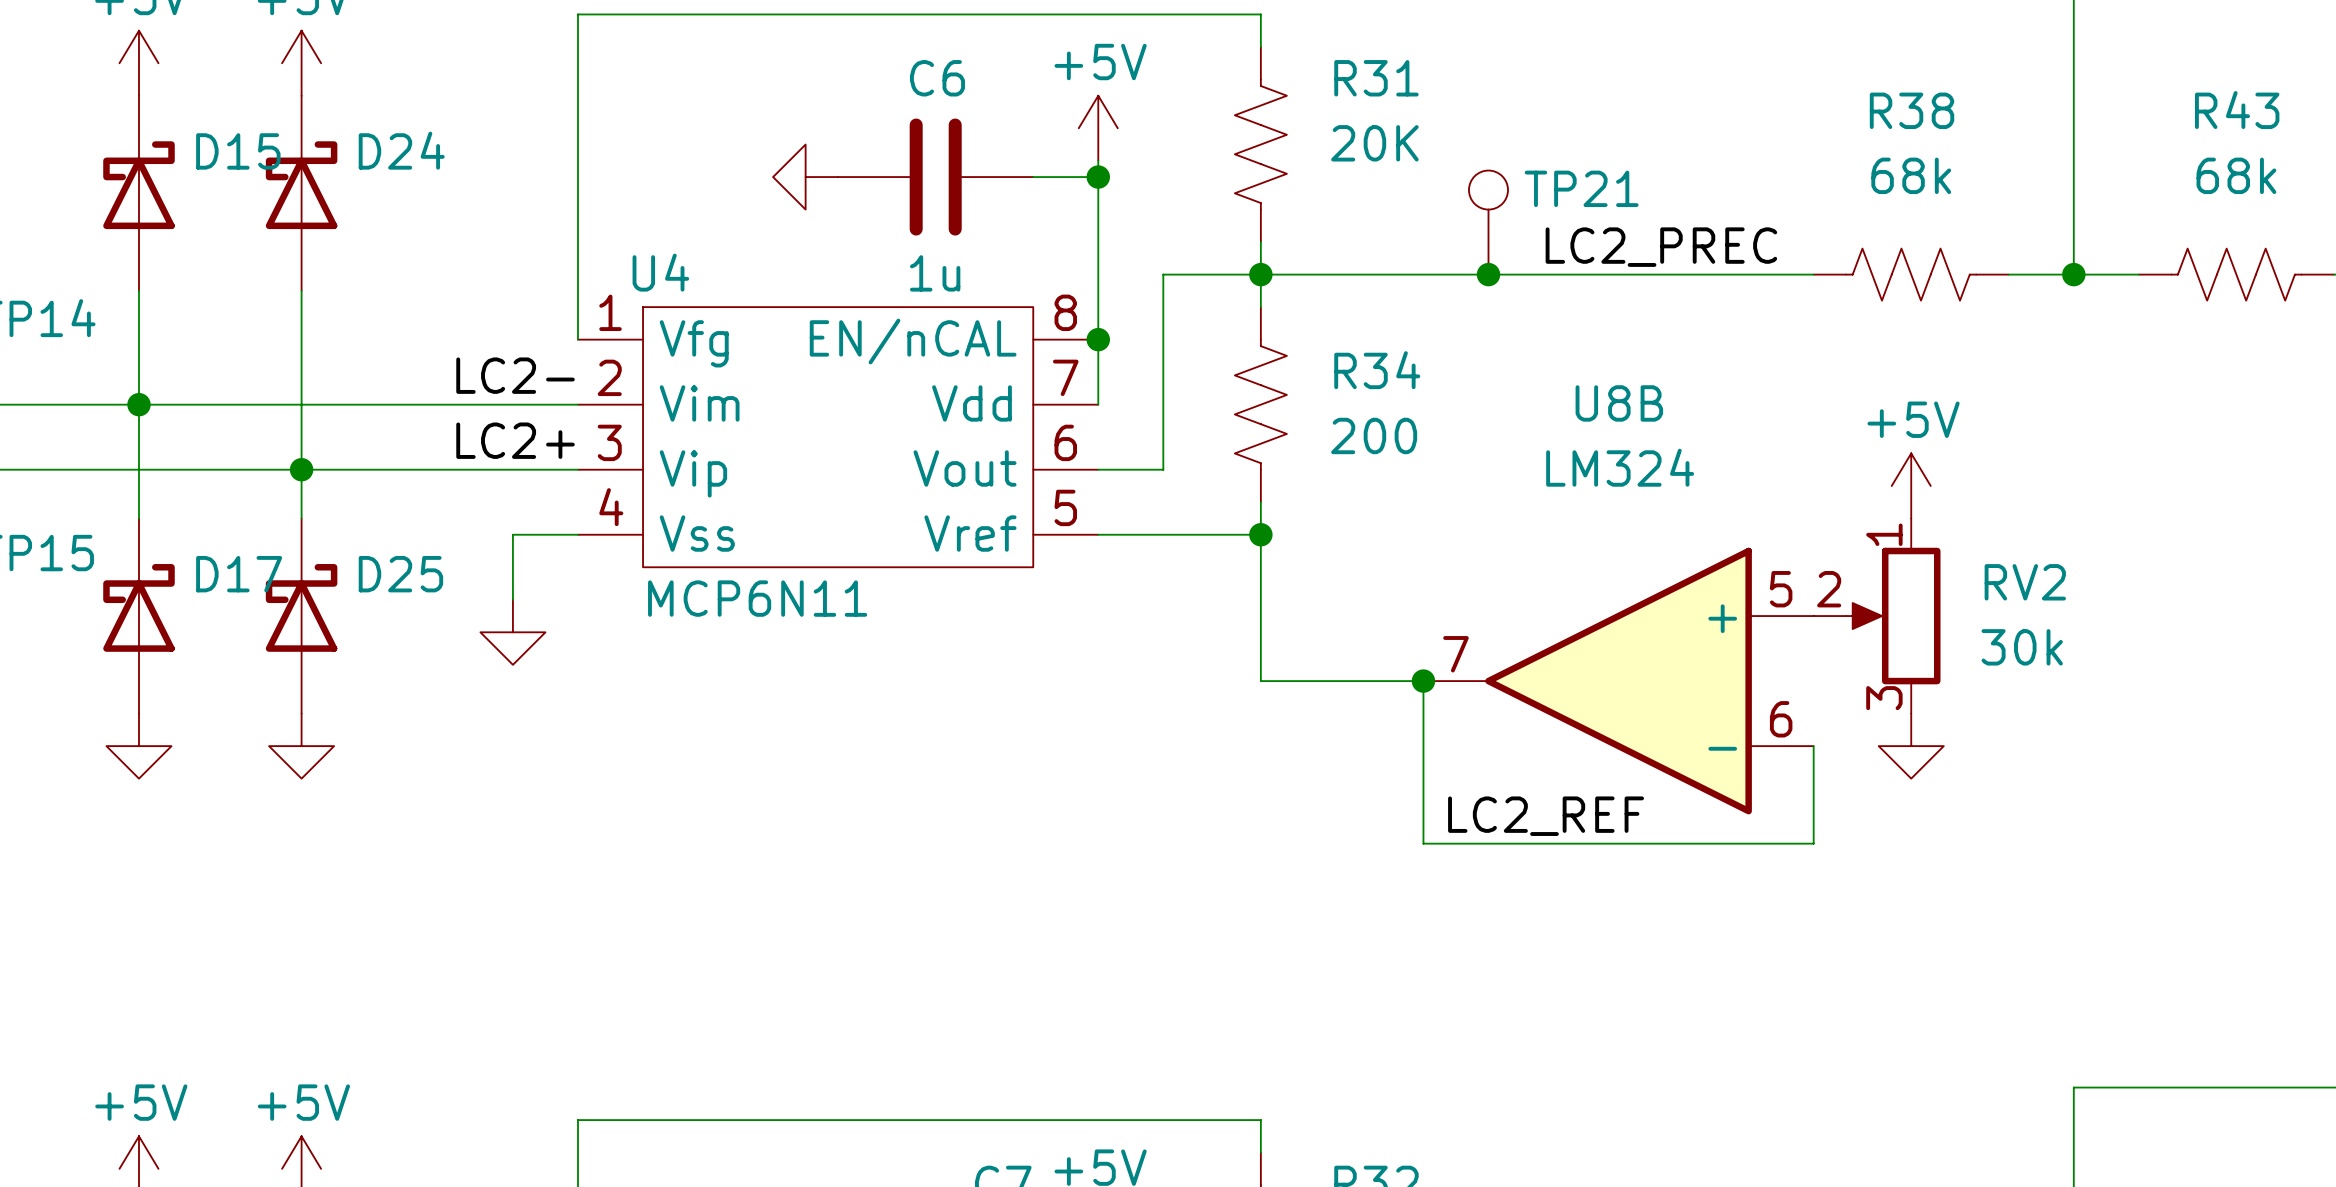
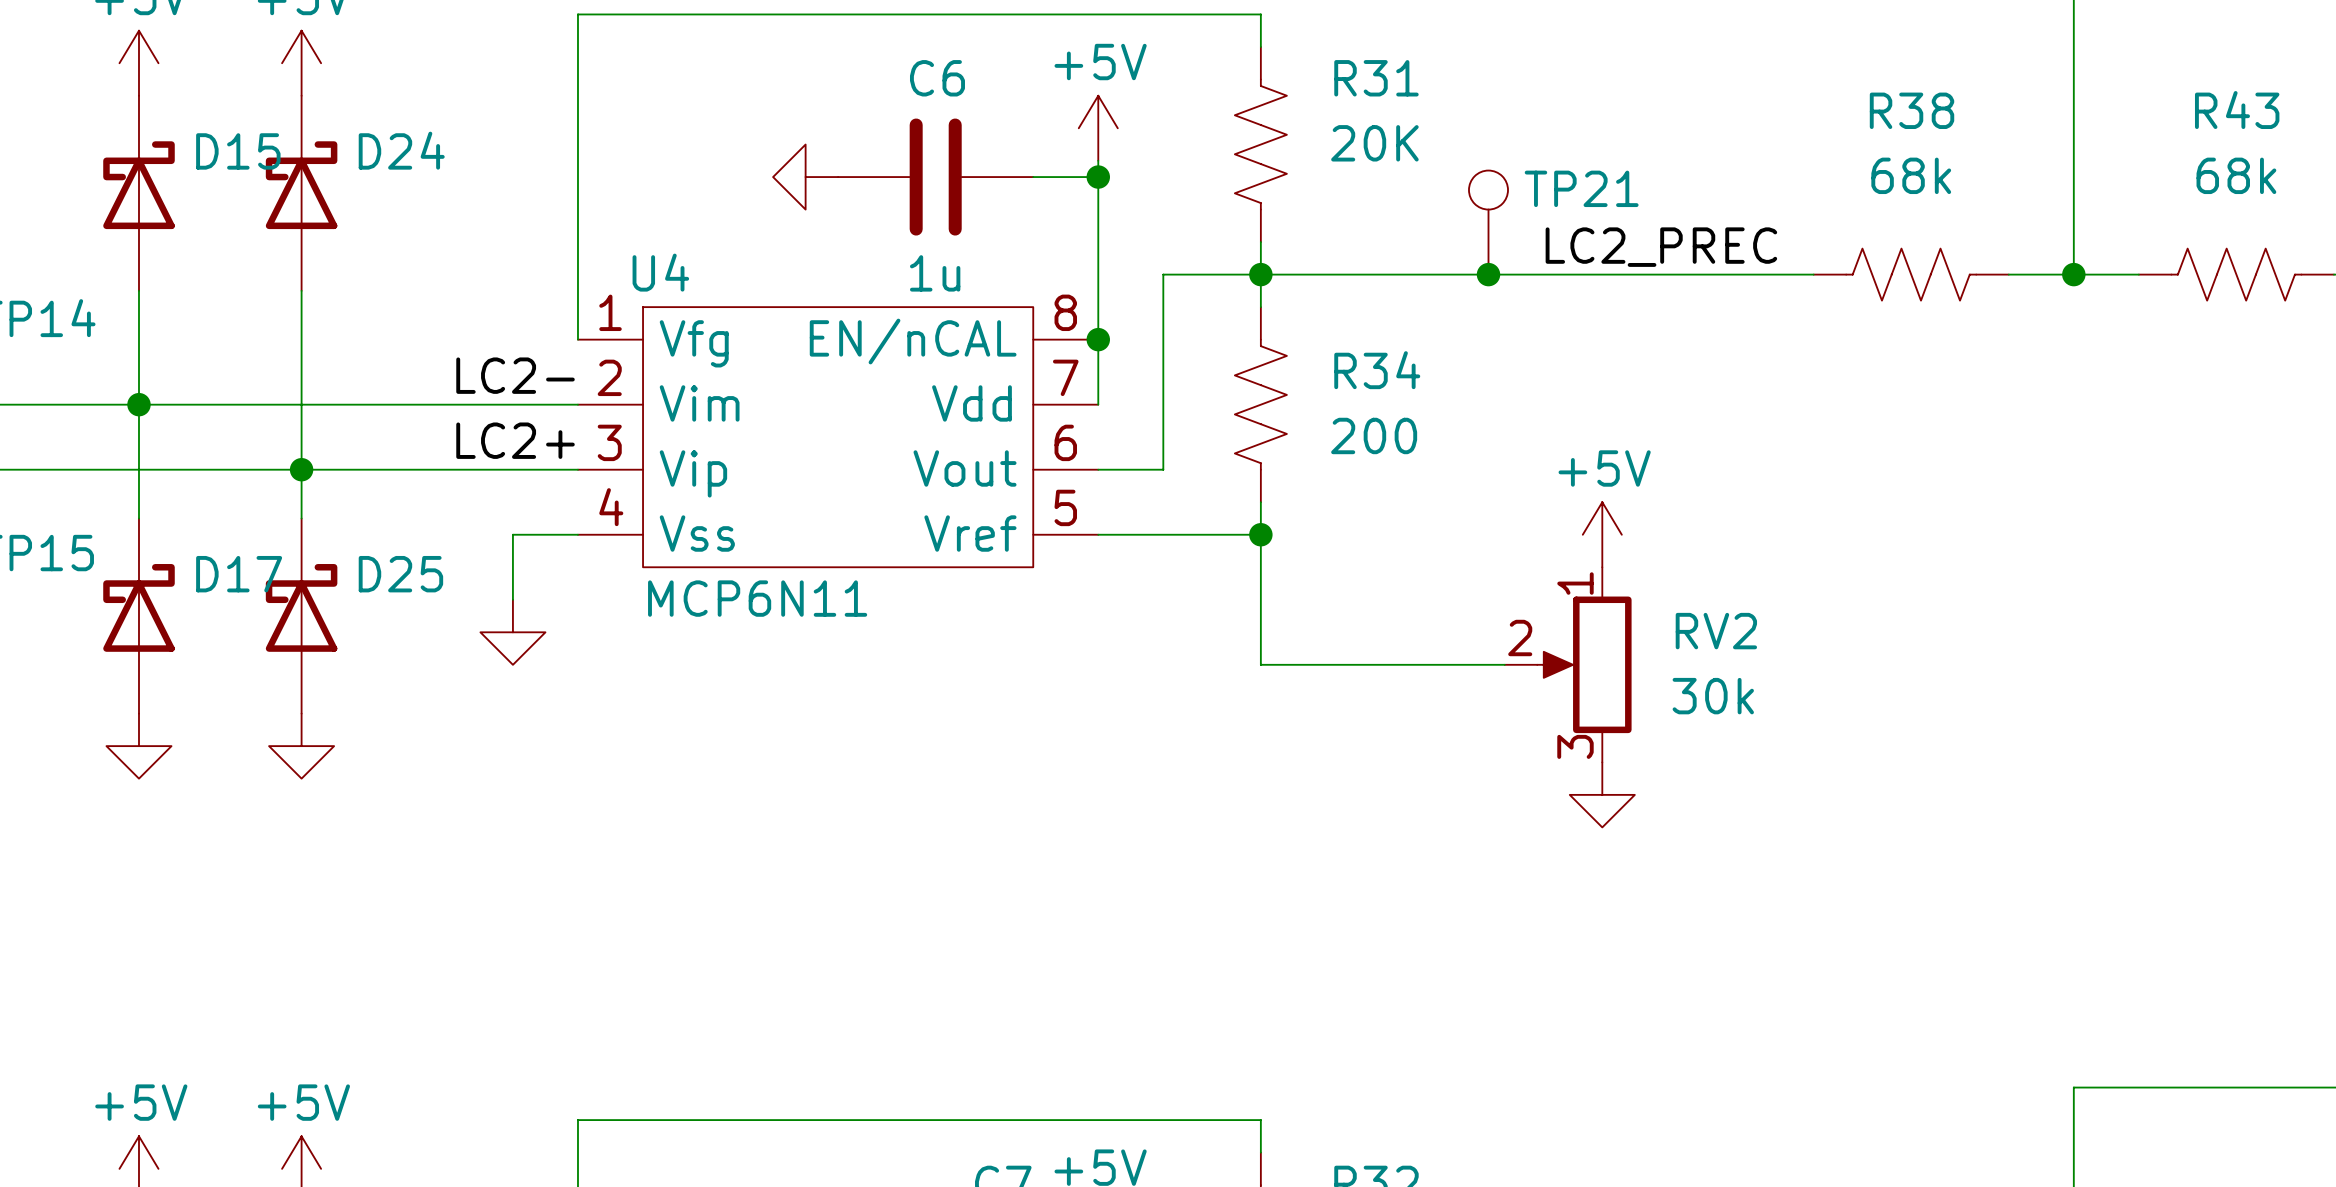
power symbol position: +5V (1911, 485) -> +5V (1602, 534)
RV2 position: (1877, 616) -> (1568, 664)
wire: (1260, 664) (1260, 681) (1423, 681) (1423, 843) (1813, 843) (1813, 746) -> (1260, 664) (1504, 664)
junction: (1423, 681) -> none
U8B: LM324 (1618, 681) -> none
power symbol position: (1911, 746) -> (1602, 794)
label: LC2_REF (1546, 816) -> none

